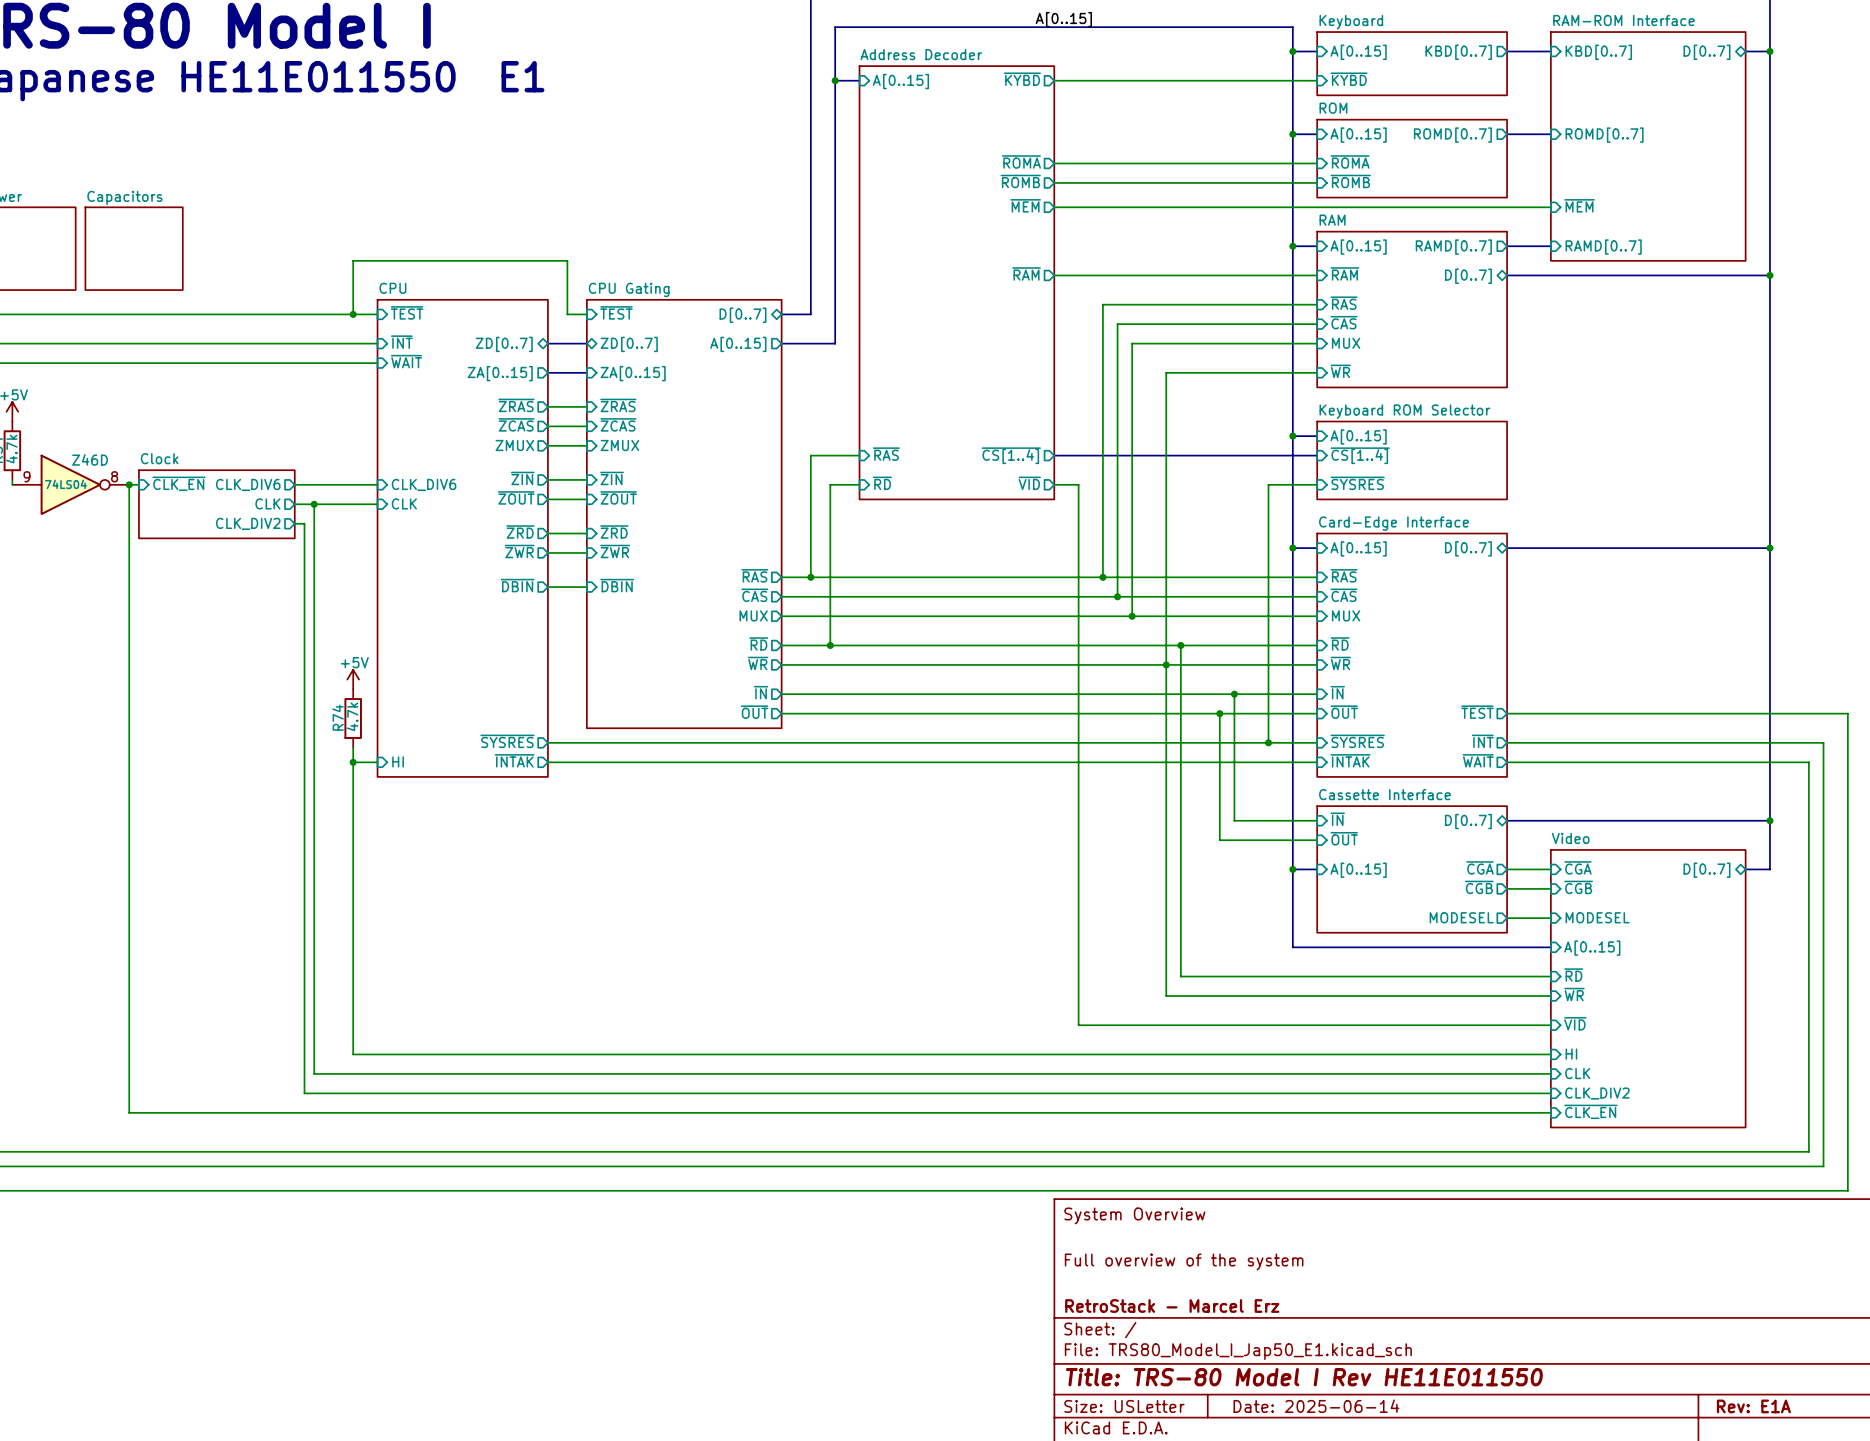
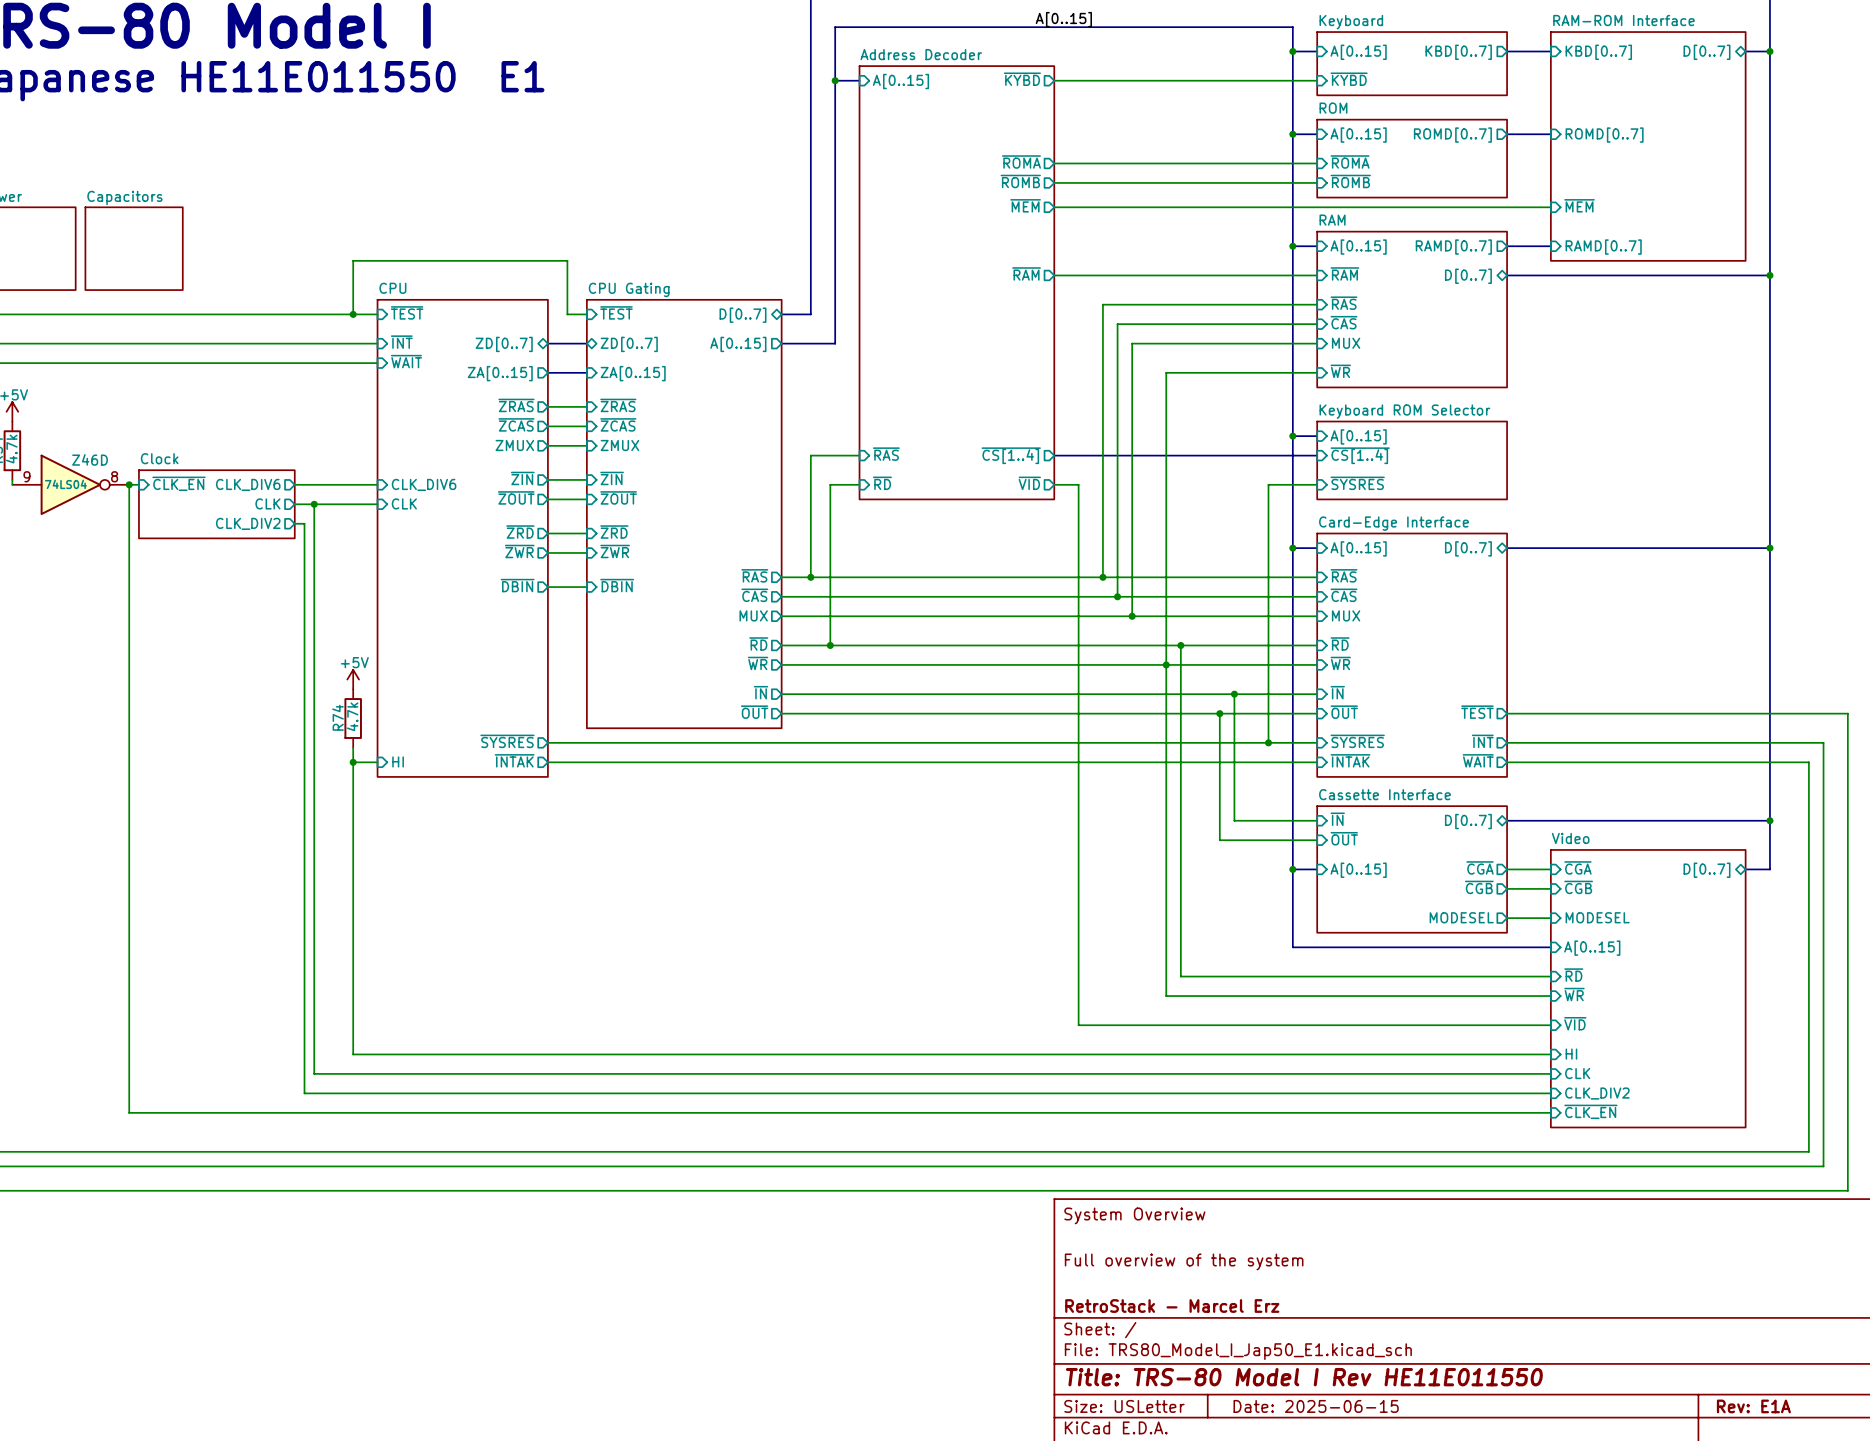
title block: Date: 2025-06-14 (1316, 1406) -> Date: 2025-06-15 (1316, 1406)

